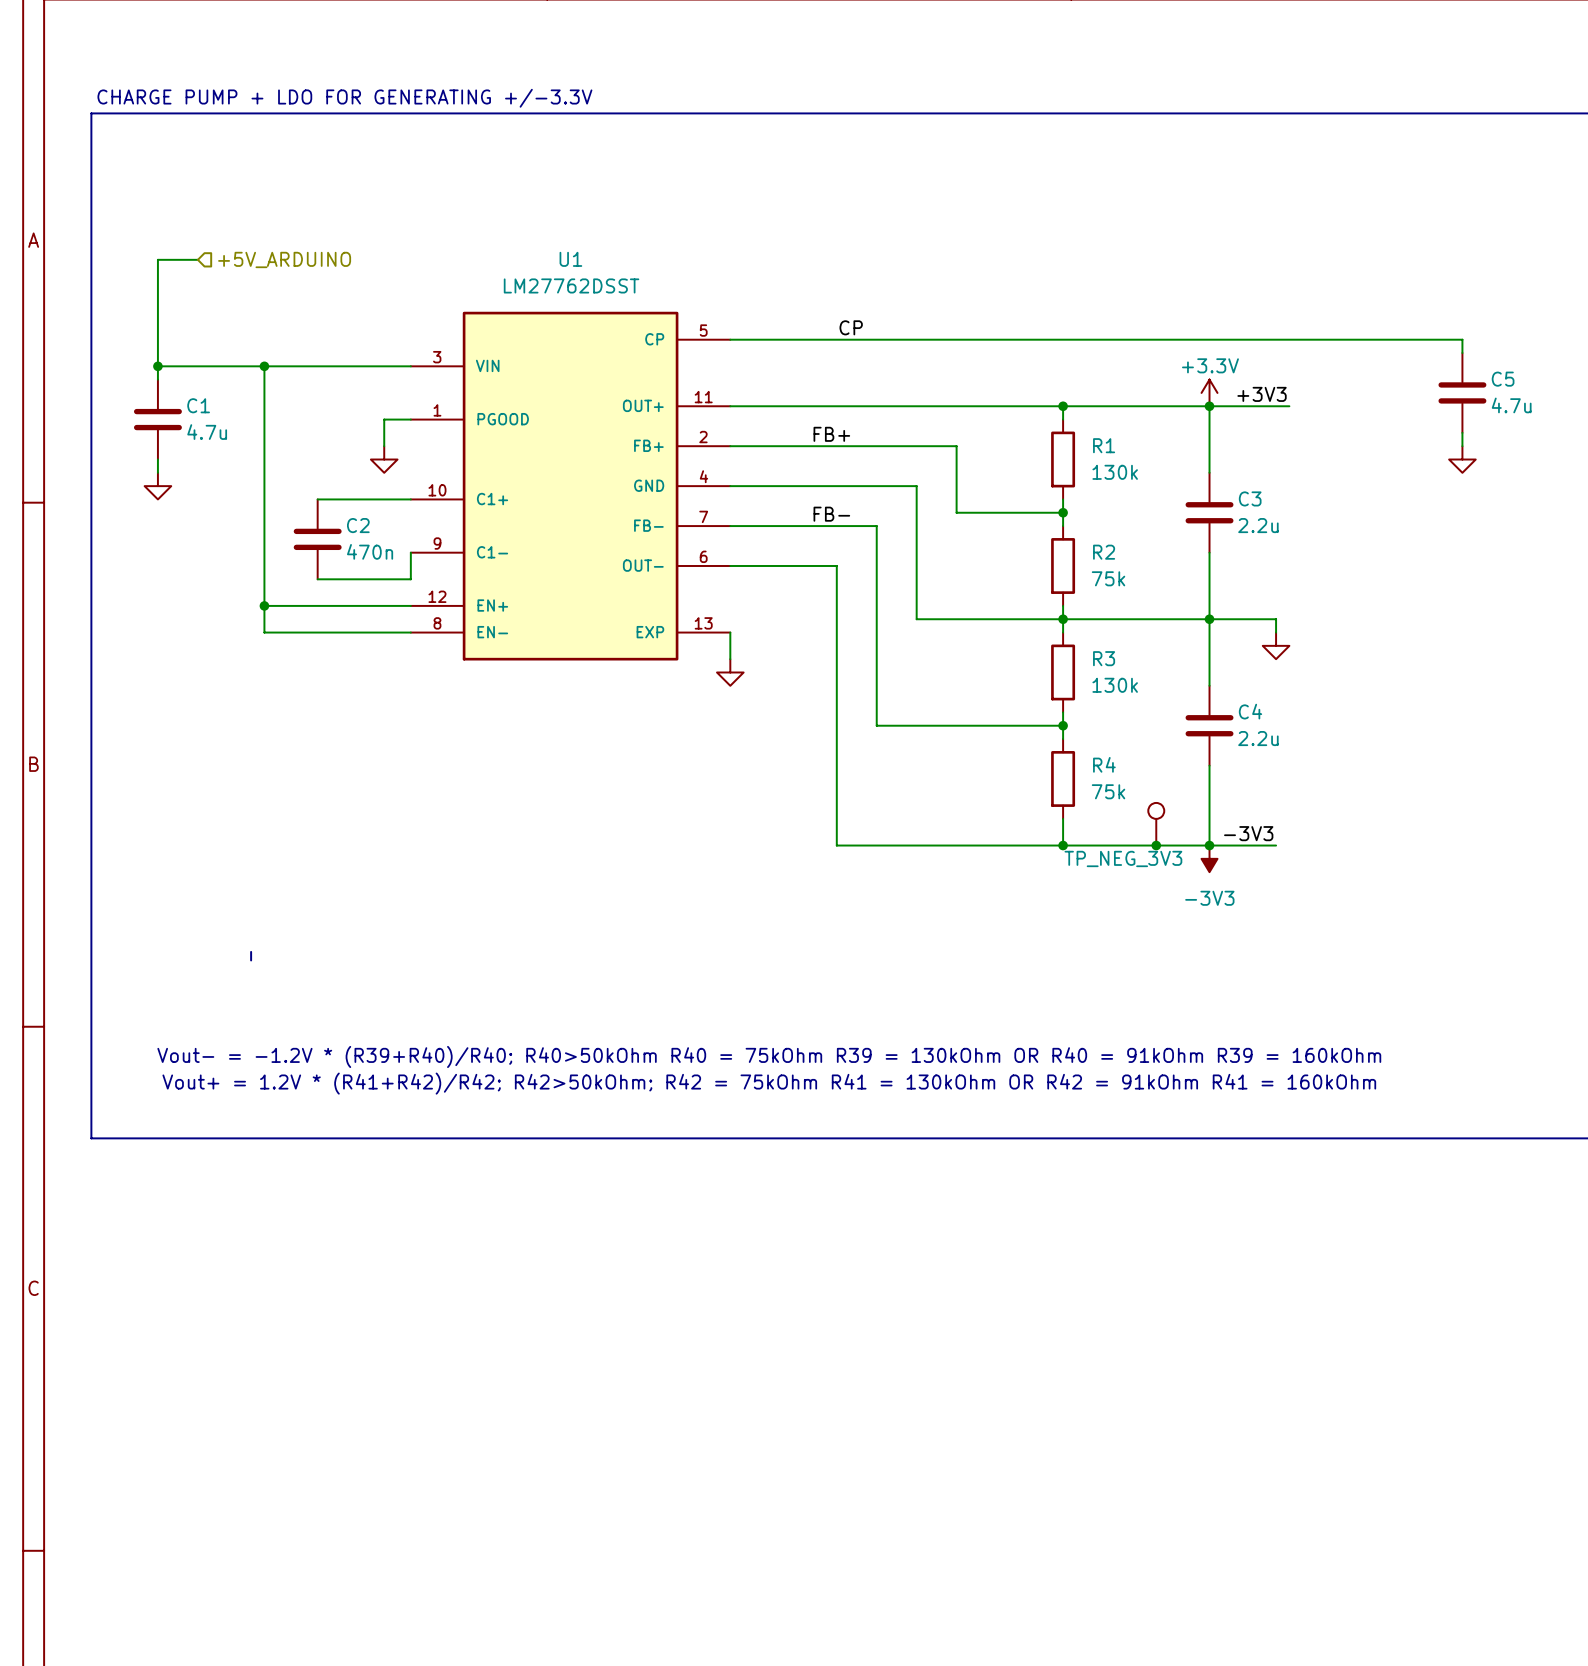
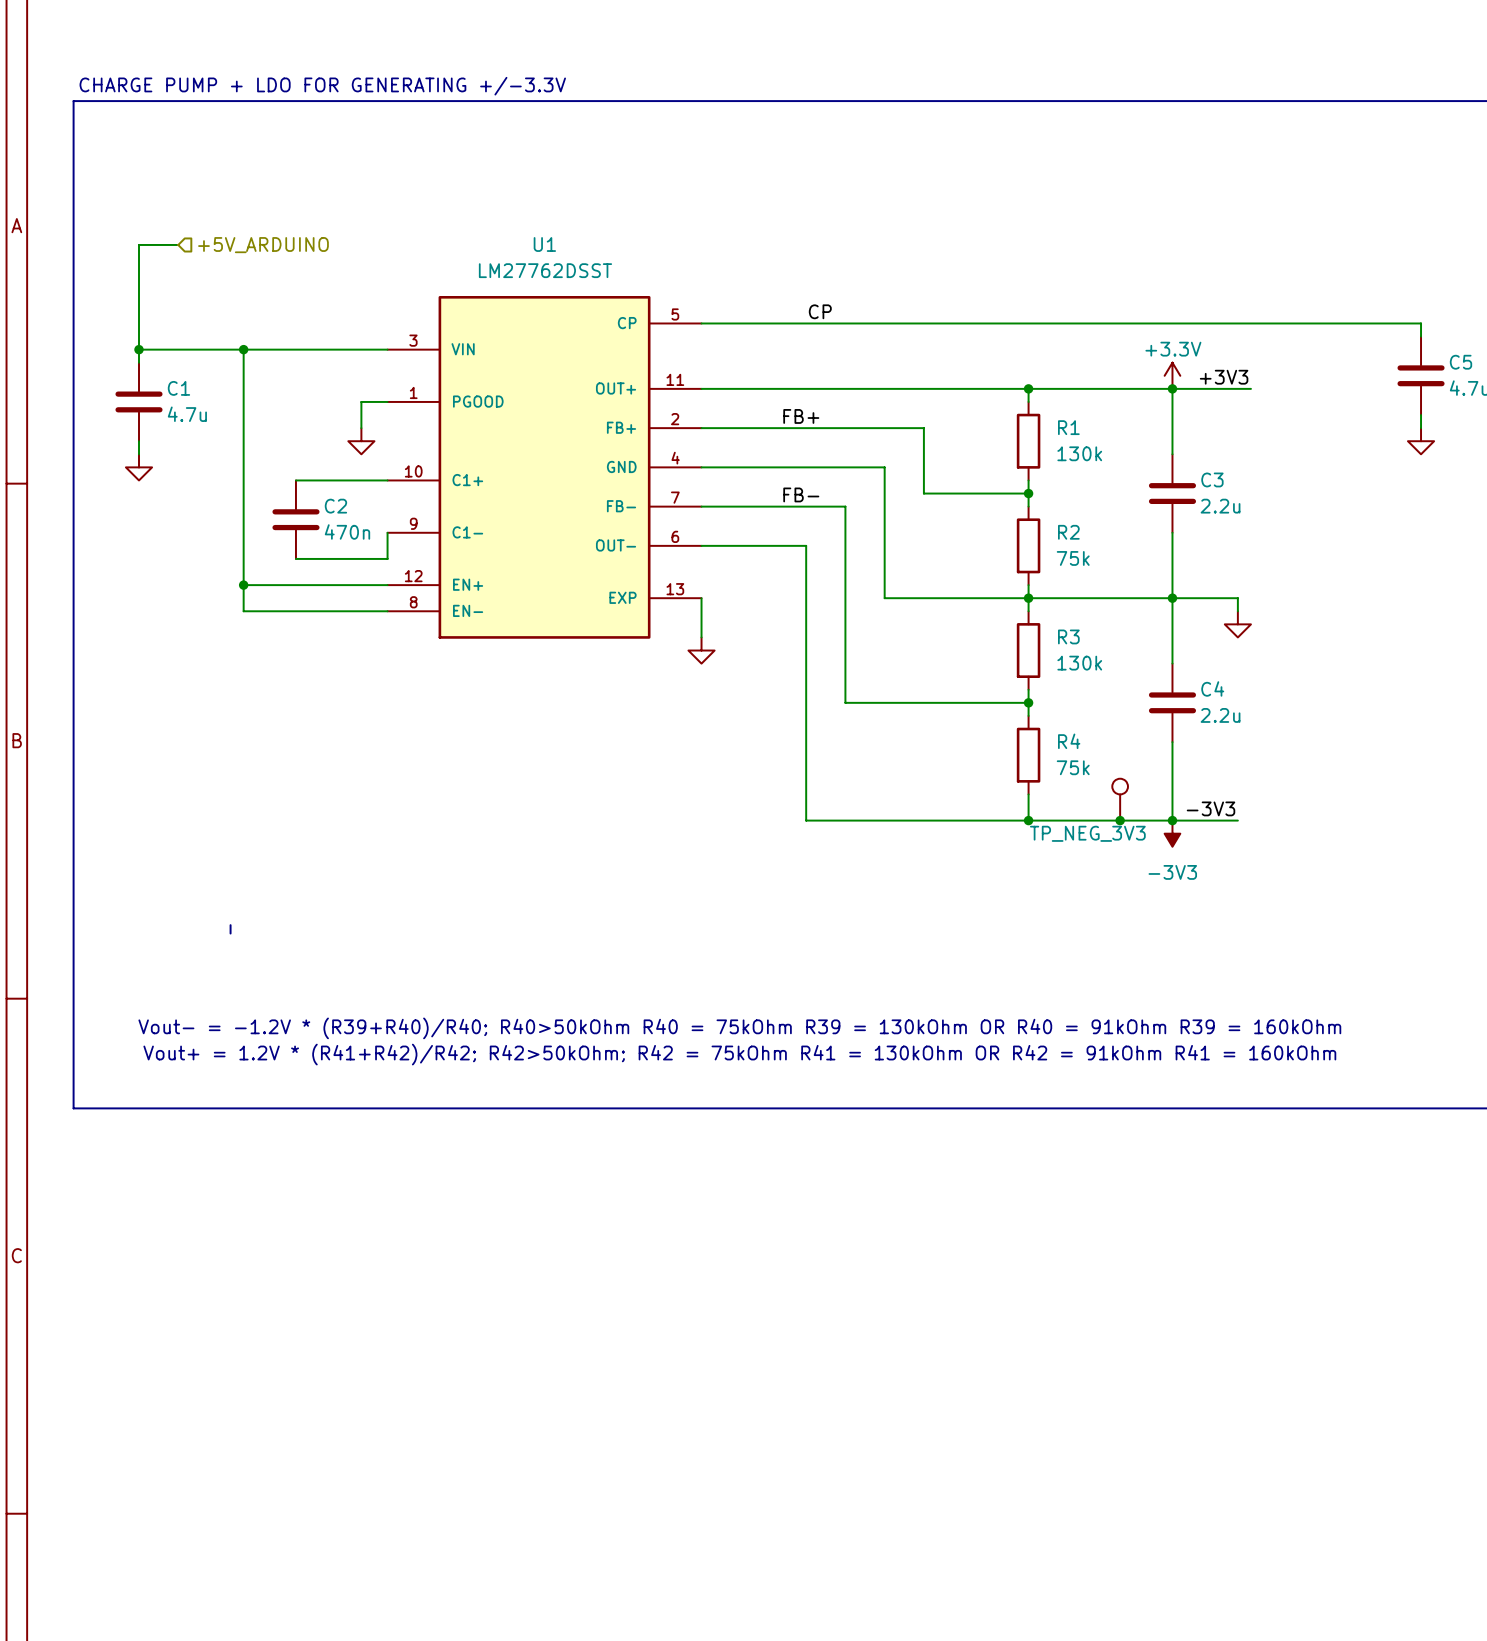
U1 symbol: [410, 311, 731, 661] -> [387, 296, 702, 639]
wire: none -> (701, 598) (701, 611)

